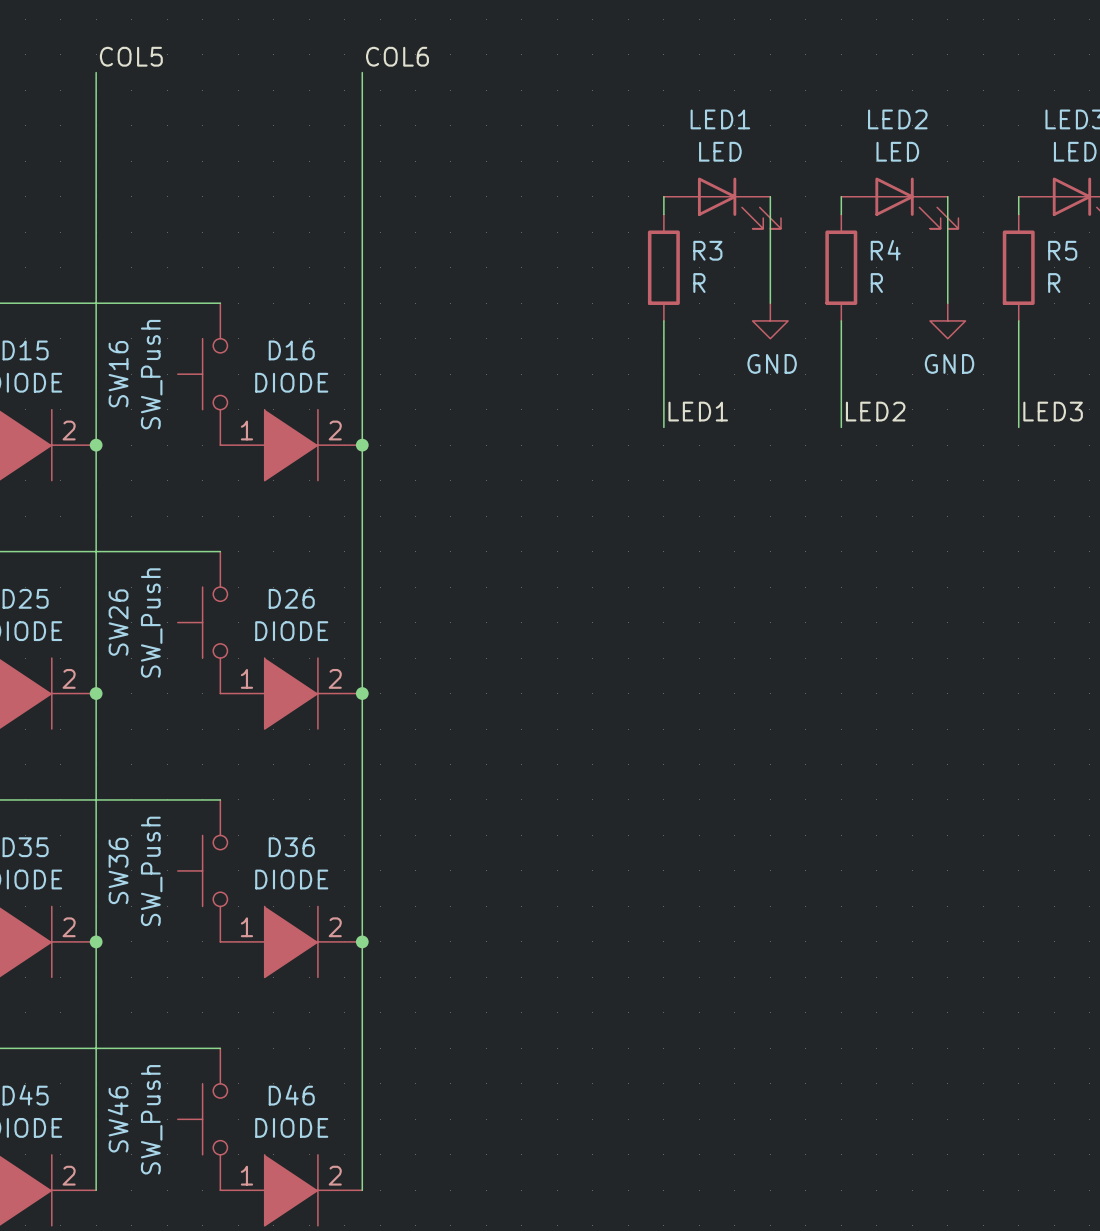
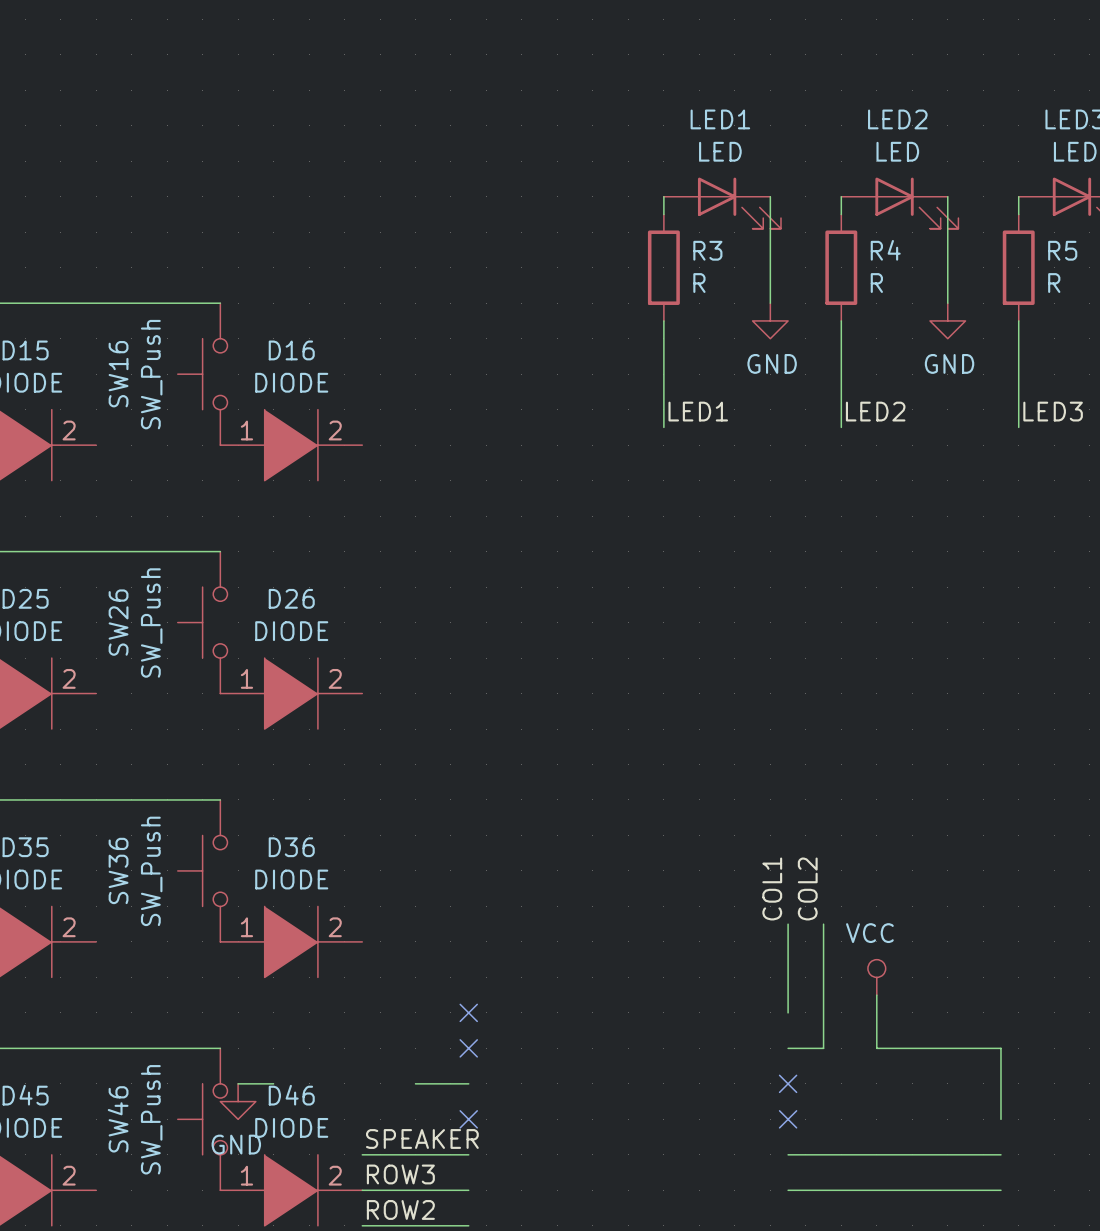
label: COL5 (131, 56) -> none
label: COL6 (397, 56) -> none
wire: (96, 72) (96, 1190) -> none
wire: (362, 72) (362, 1190) -> (468, 1190) (362, 1190)
junction: (96, 445) -> none
junction: (362, 445) -> none
junction: (96, 693) -> none
junction: (362, 693) -> none
label: none -> COL1 (772, 888)
label: none -> COL2 (807, 888)
wire: none -> (788, 924) (788, 1012)
wire: none -> (823, 924) (823, 1048) (788, 1048)
junction: (96, 941) -> none
junction: (362, 941) -> none
power symbol: none -> VCC (876, 977)
wire: none -> (876, 995) (876, 1048) (1000, 1048) (1000, 1119)
no-connect mark: none -> (468, 1012)
no-connect mark: none -> (468, 1048)
wire: none -> (238, 1083) (273, 1083)
wire: none -> (415, 1083) (468, 1083)
no-connect mark: none -> (788, 1083)
power symbol: none -> GND (238, 1101)
no-connect mark: none -> (468, 1119)
no-connect mark: none -> (788, 1119)
label: none -> SPEAKER (422, 1138)
wire: none -> (362, 1154) (468, 1154)
wire: none -> (788, 1154) (1000, 1154)
label: none -> ROW3 (400, 1174)
wire: none -> (788, 1190) (1000, 1190)
label: none -> ROW2 (400, 1209)
wire: none -> (362, 1225) (468, 1225)

